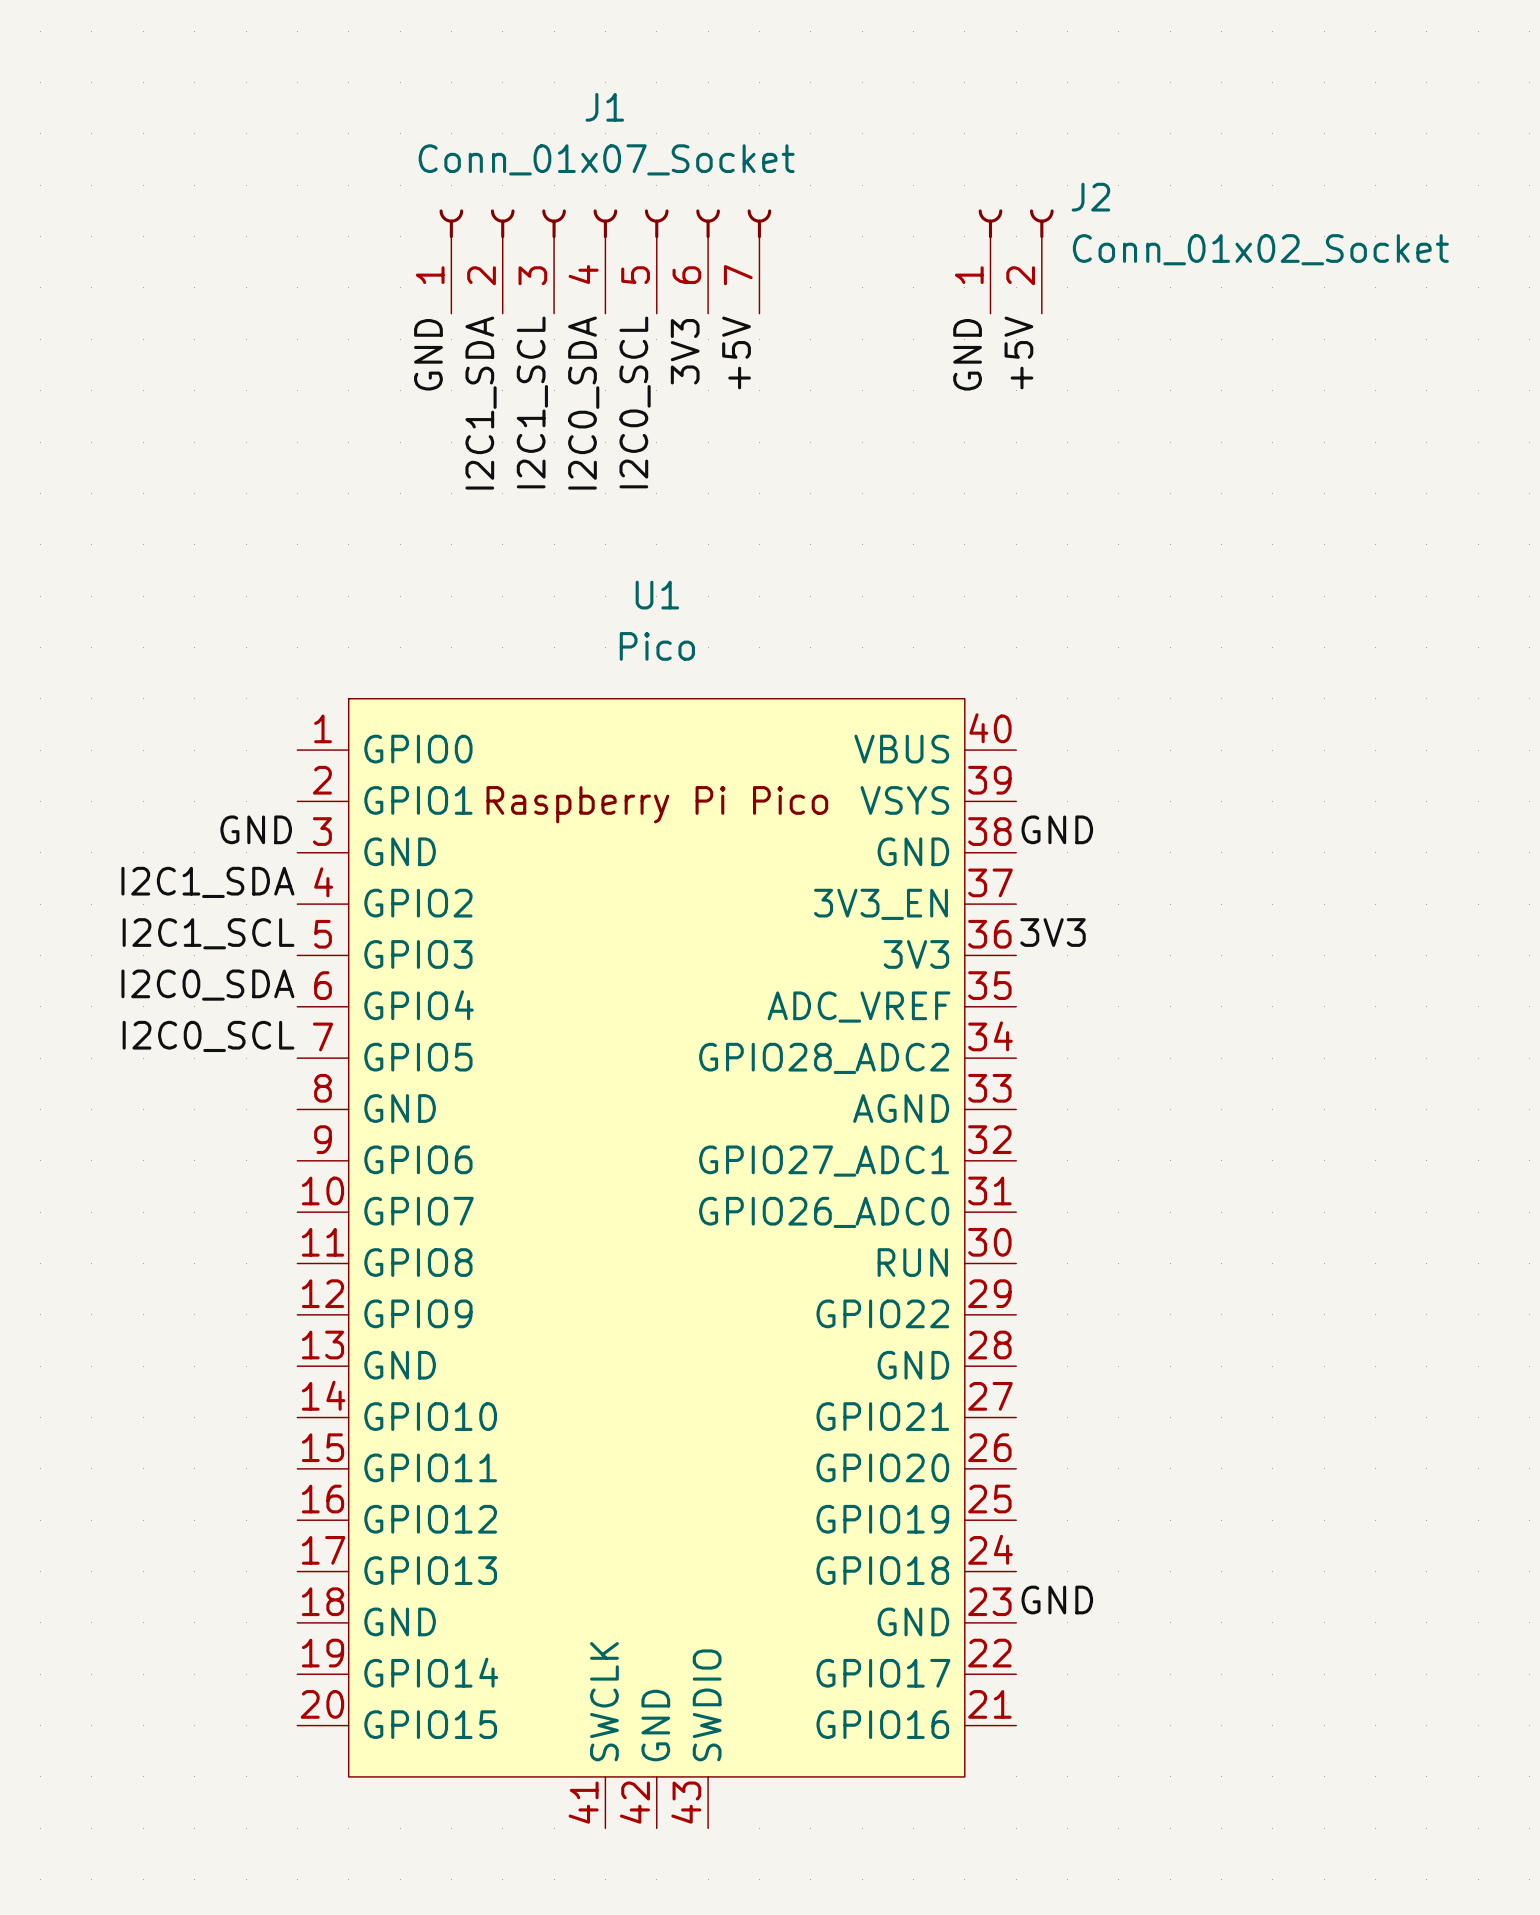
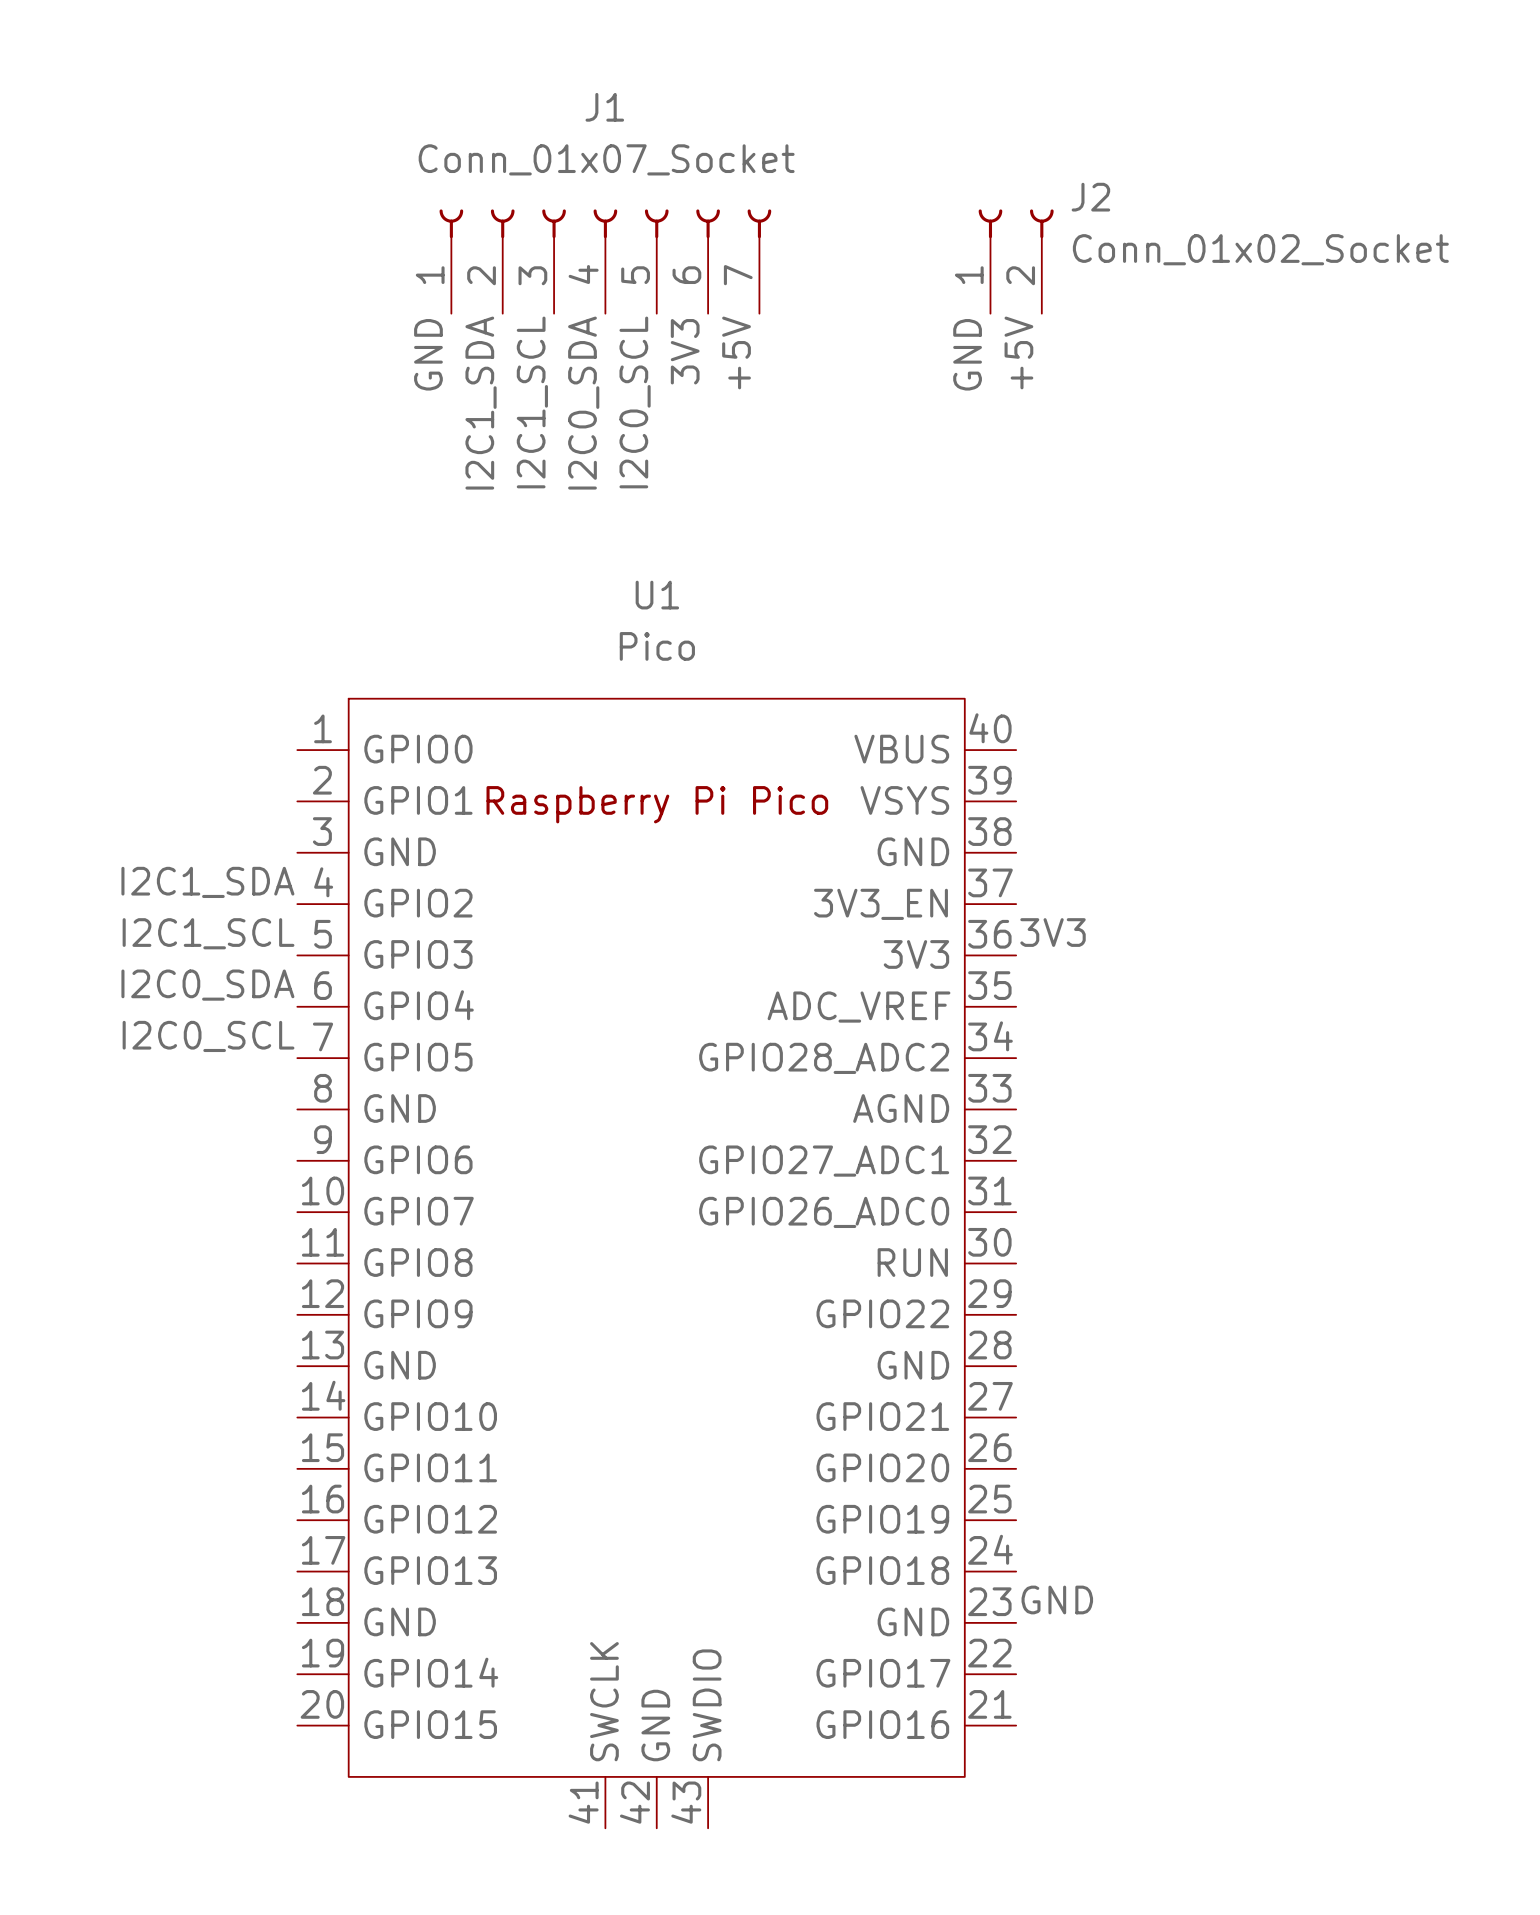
label: GND (256, 829) -> none
label: GND (1057, 829) -> none

